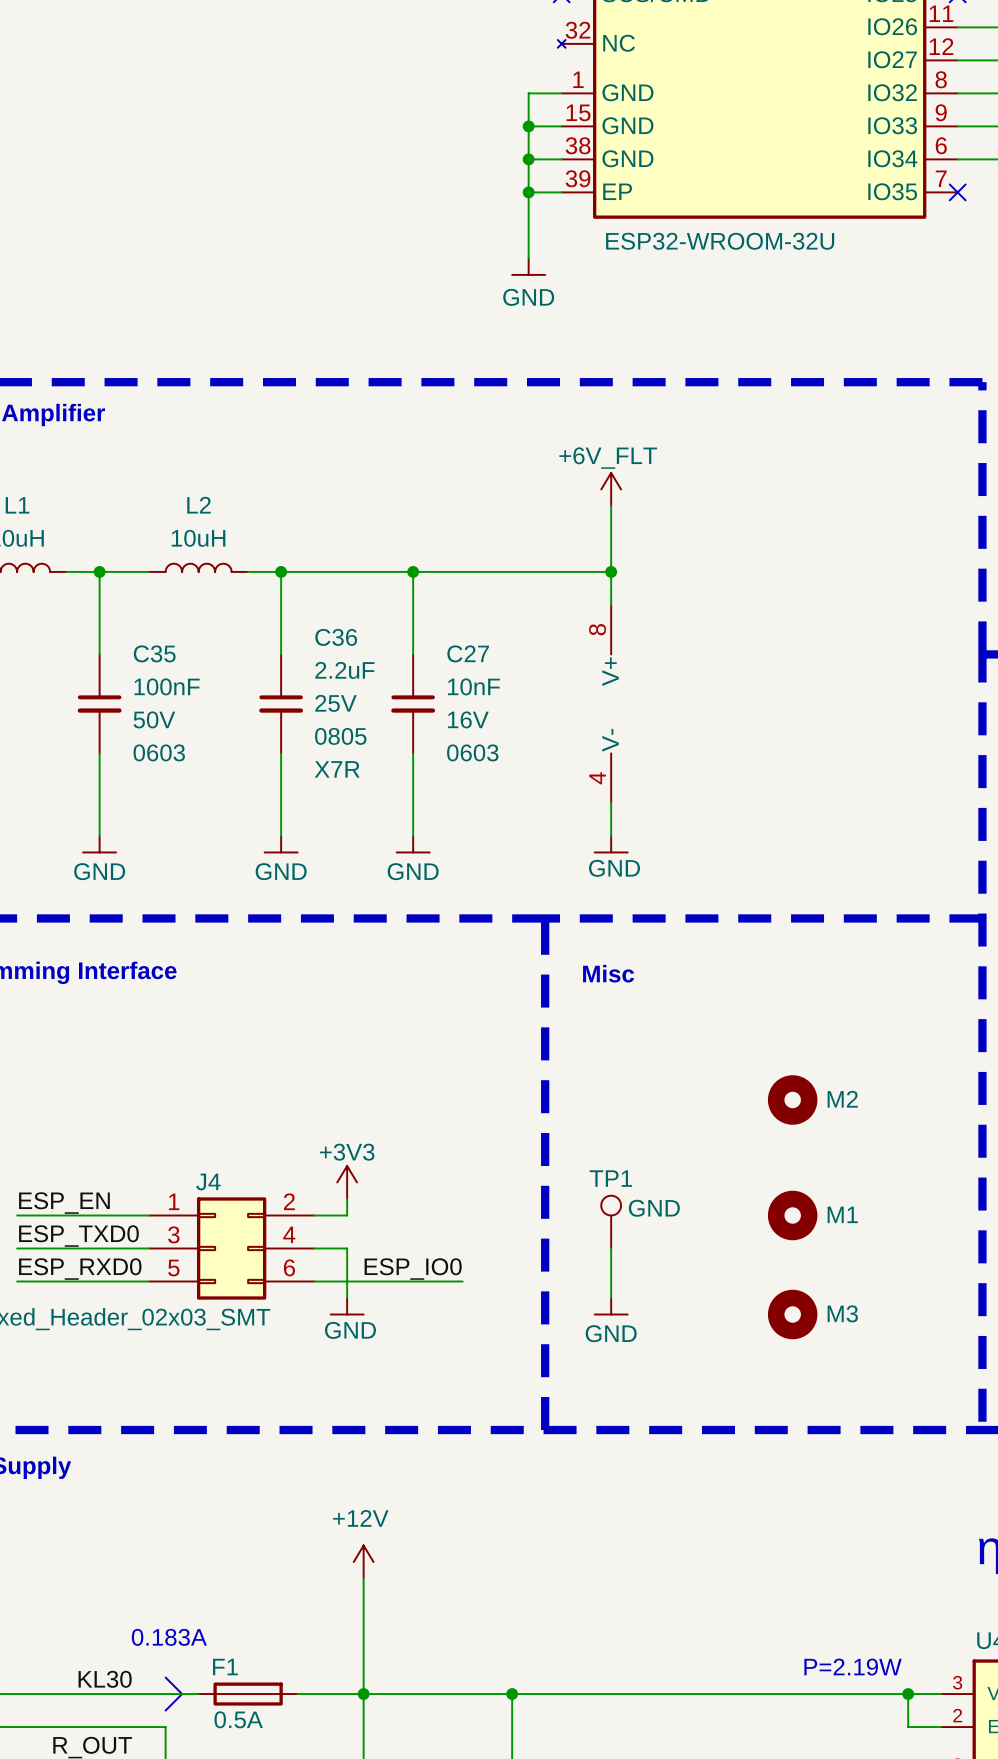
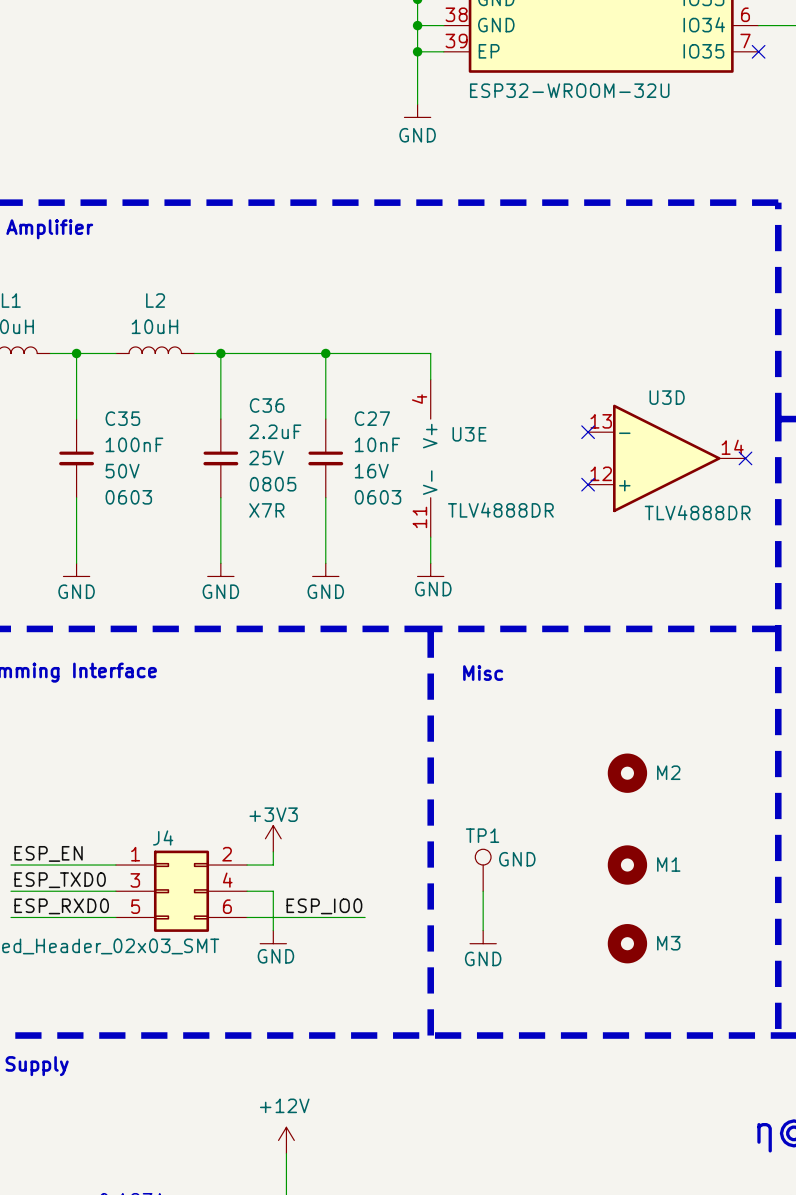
power symbol: +6V_FLT (611, 489) -> none
wire: (611, 505) (611, 604) -> none
wire: (545, 571) (611, 571) -> (430, 353) (430, 379)
junction: (611, 571) -> none
no-connect mark: none -> (588, 432)
U3E: none -> TLV4888DR (430, 458)
part: (611, 703) -> none
U3D: none -> TLV4888DR (666, 458)
no-connect mark: none -> (745, 458)
no-connect mark: none -> (588, 484)
wire: (611, 802) (611, 835) -> (430, 537) (430, 563)
power symbol position: GND (611, 844) -> GND (430, 569)

